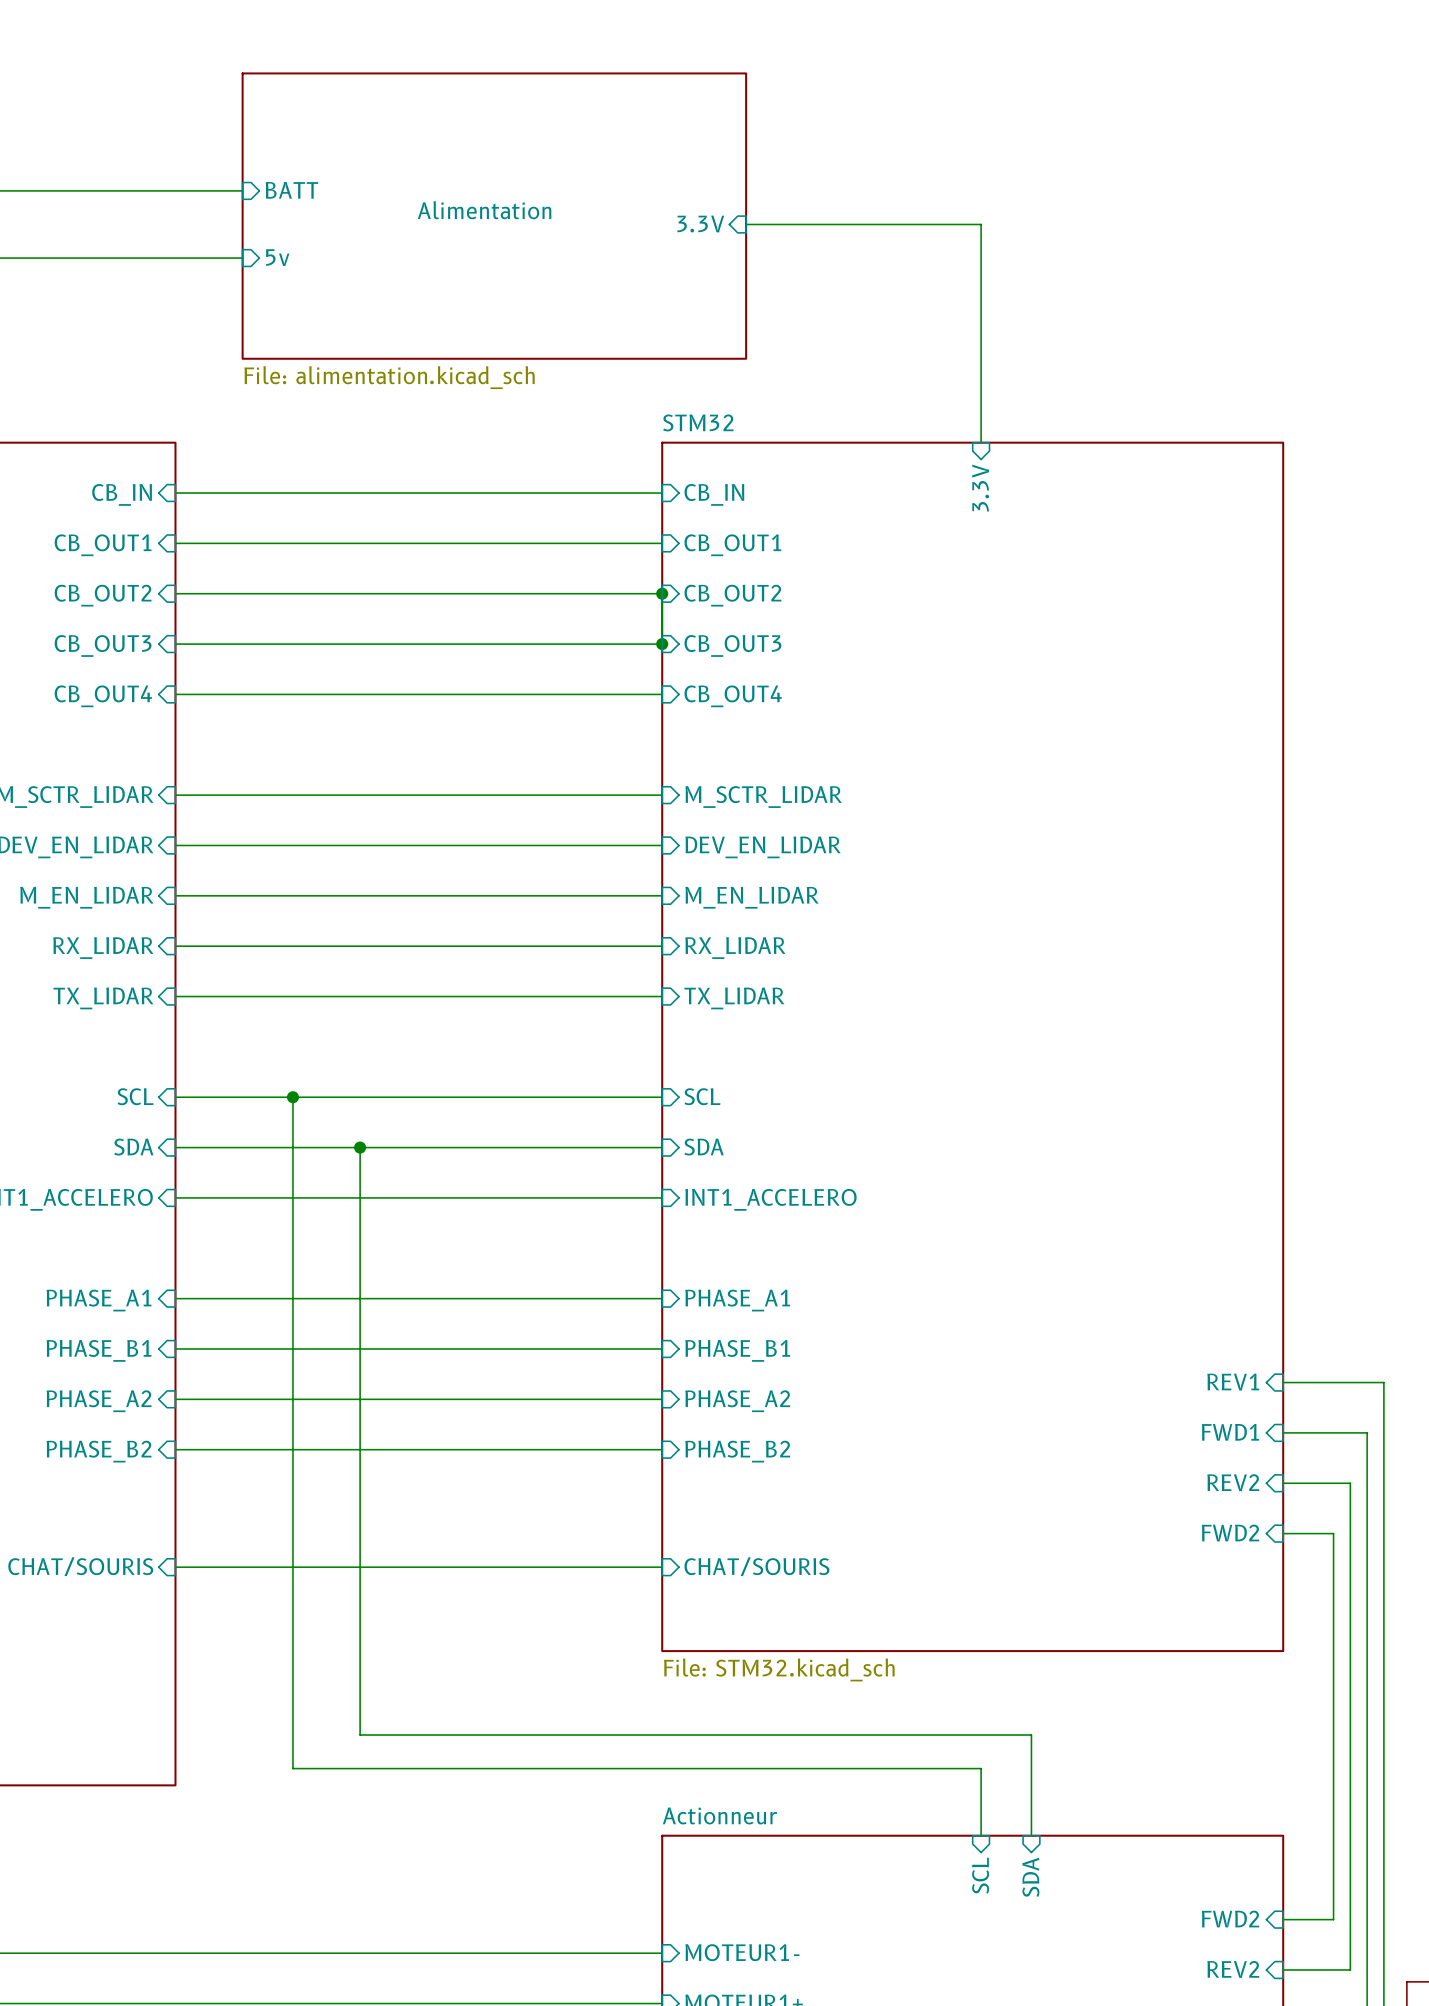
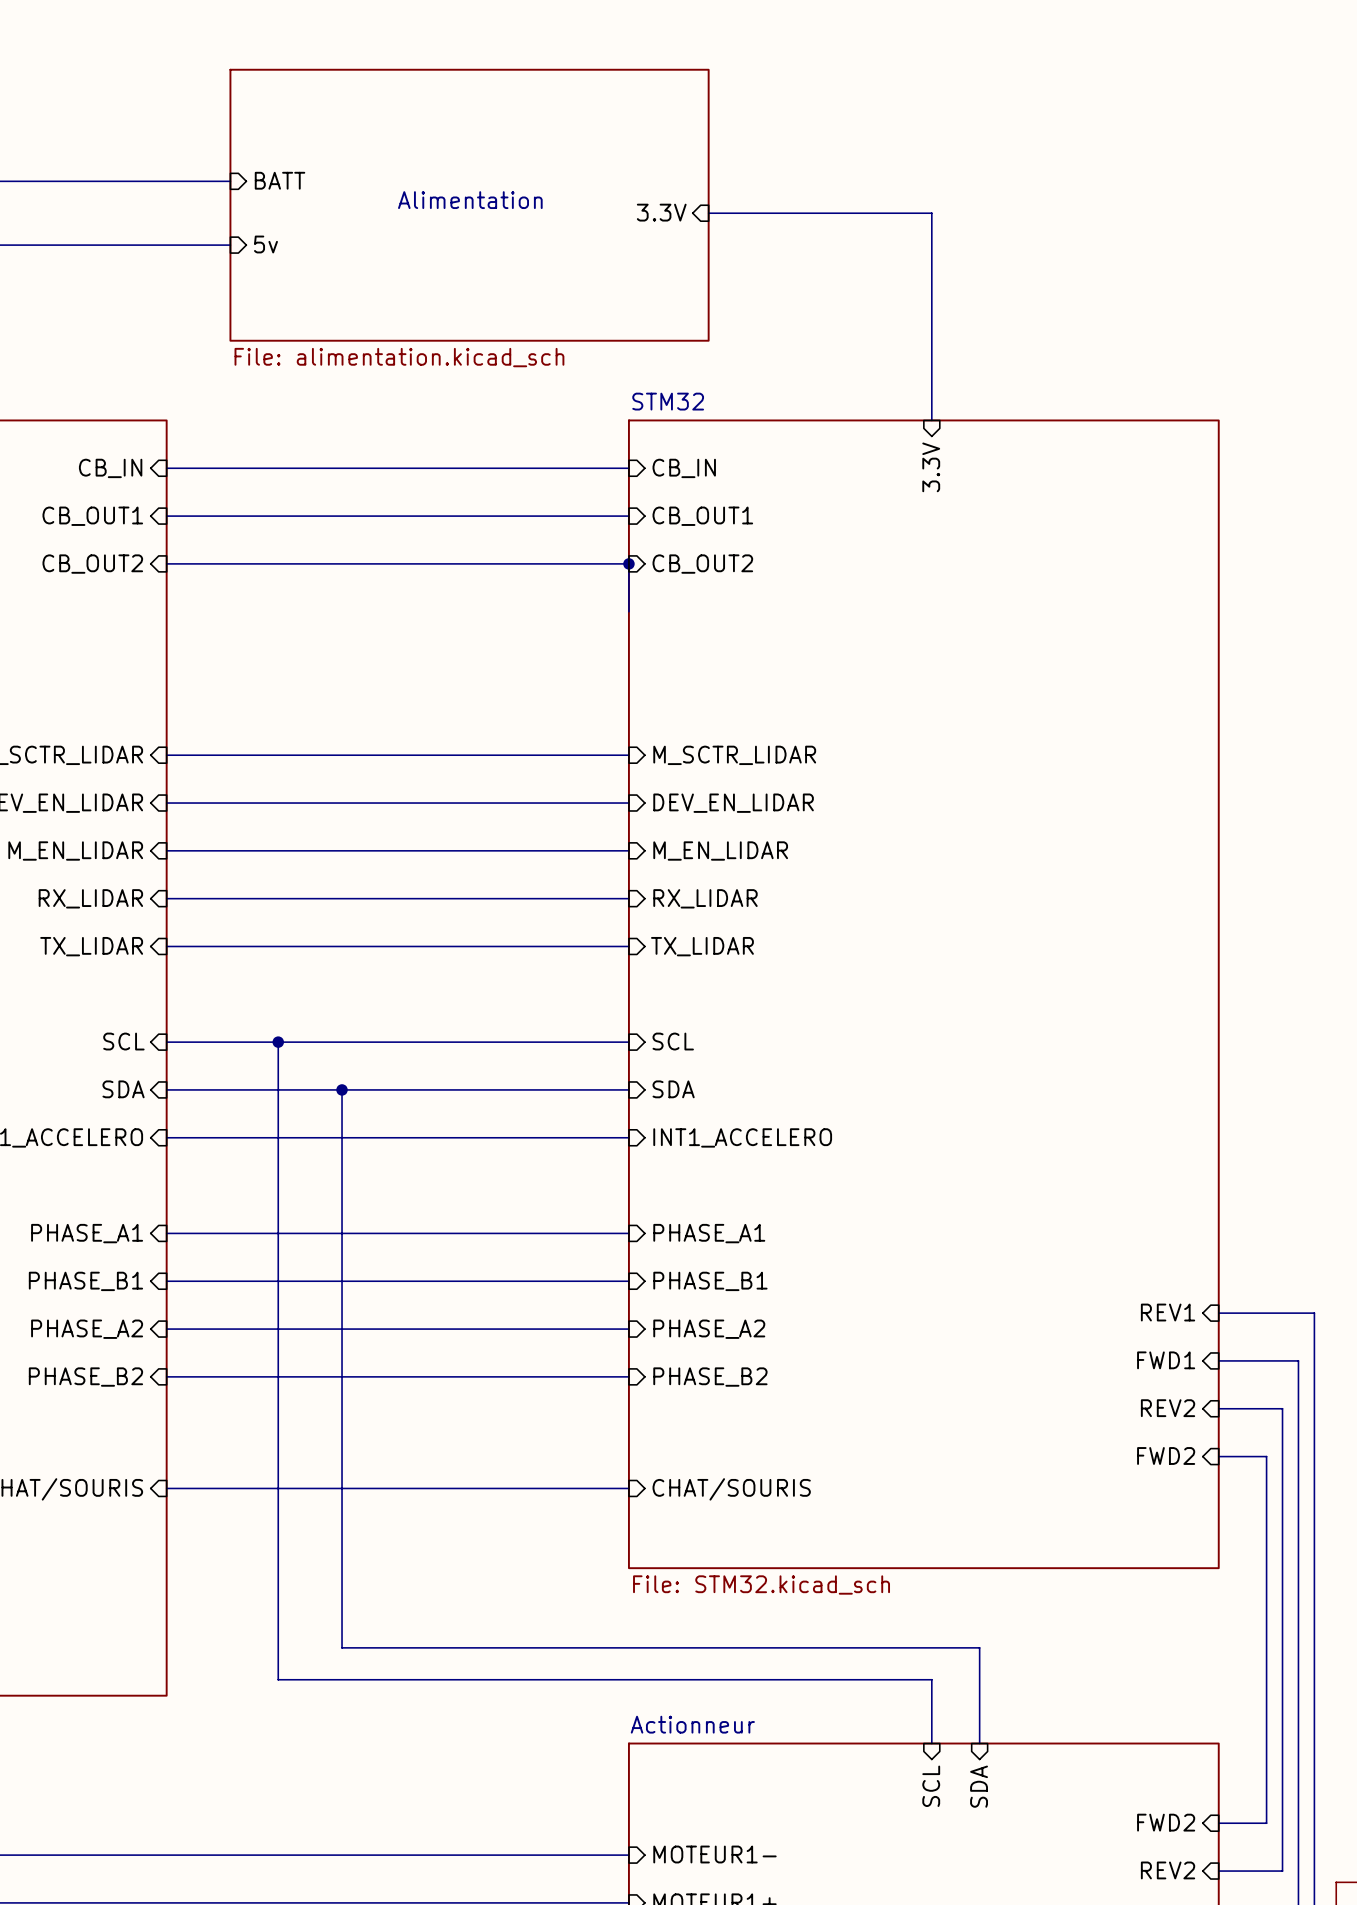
wire: (175, 644) (662, 644) -> none
junction: (662, 644) -> none
sheet pin: CB_OUT3 (103, 645) -> none
sheet pin: CB_OUT3 (732, 645) -> none
wire: (175, 694) (662, 694) -> none
sheet pin: CB_OUT4 (103, 696) -> none
sheet pin: CB_OUT4 (733, 696) -> none

